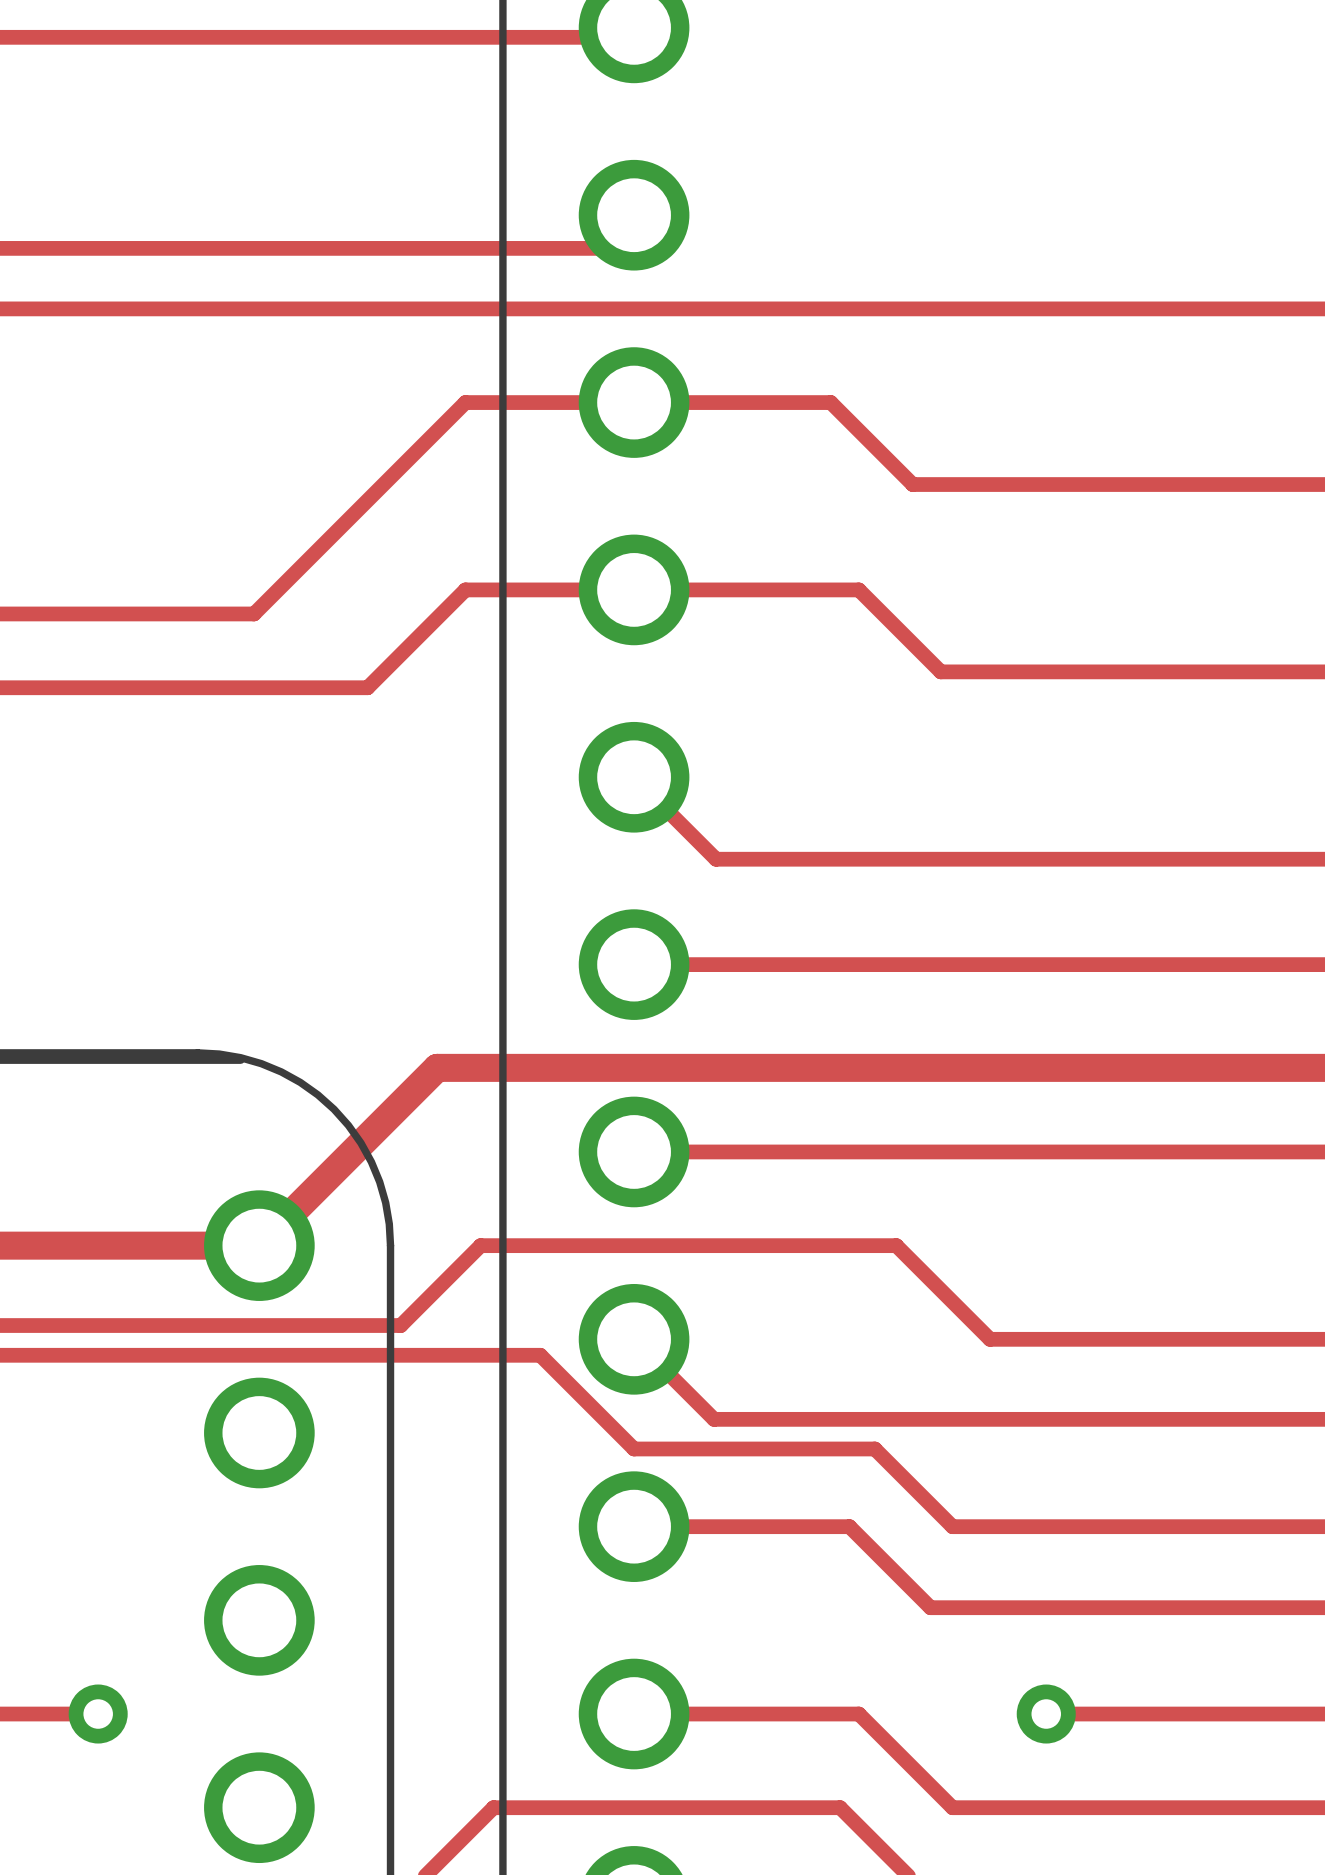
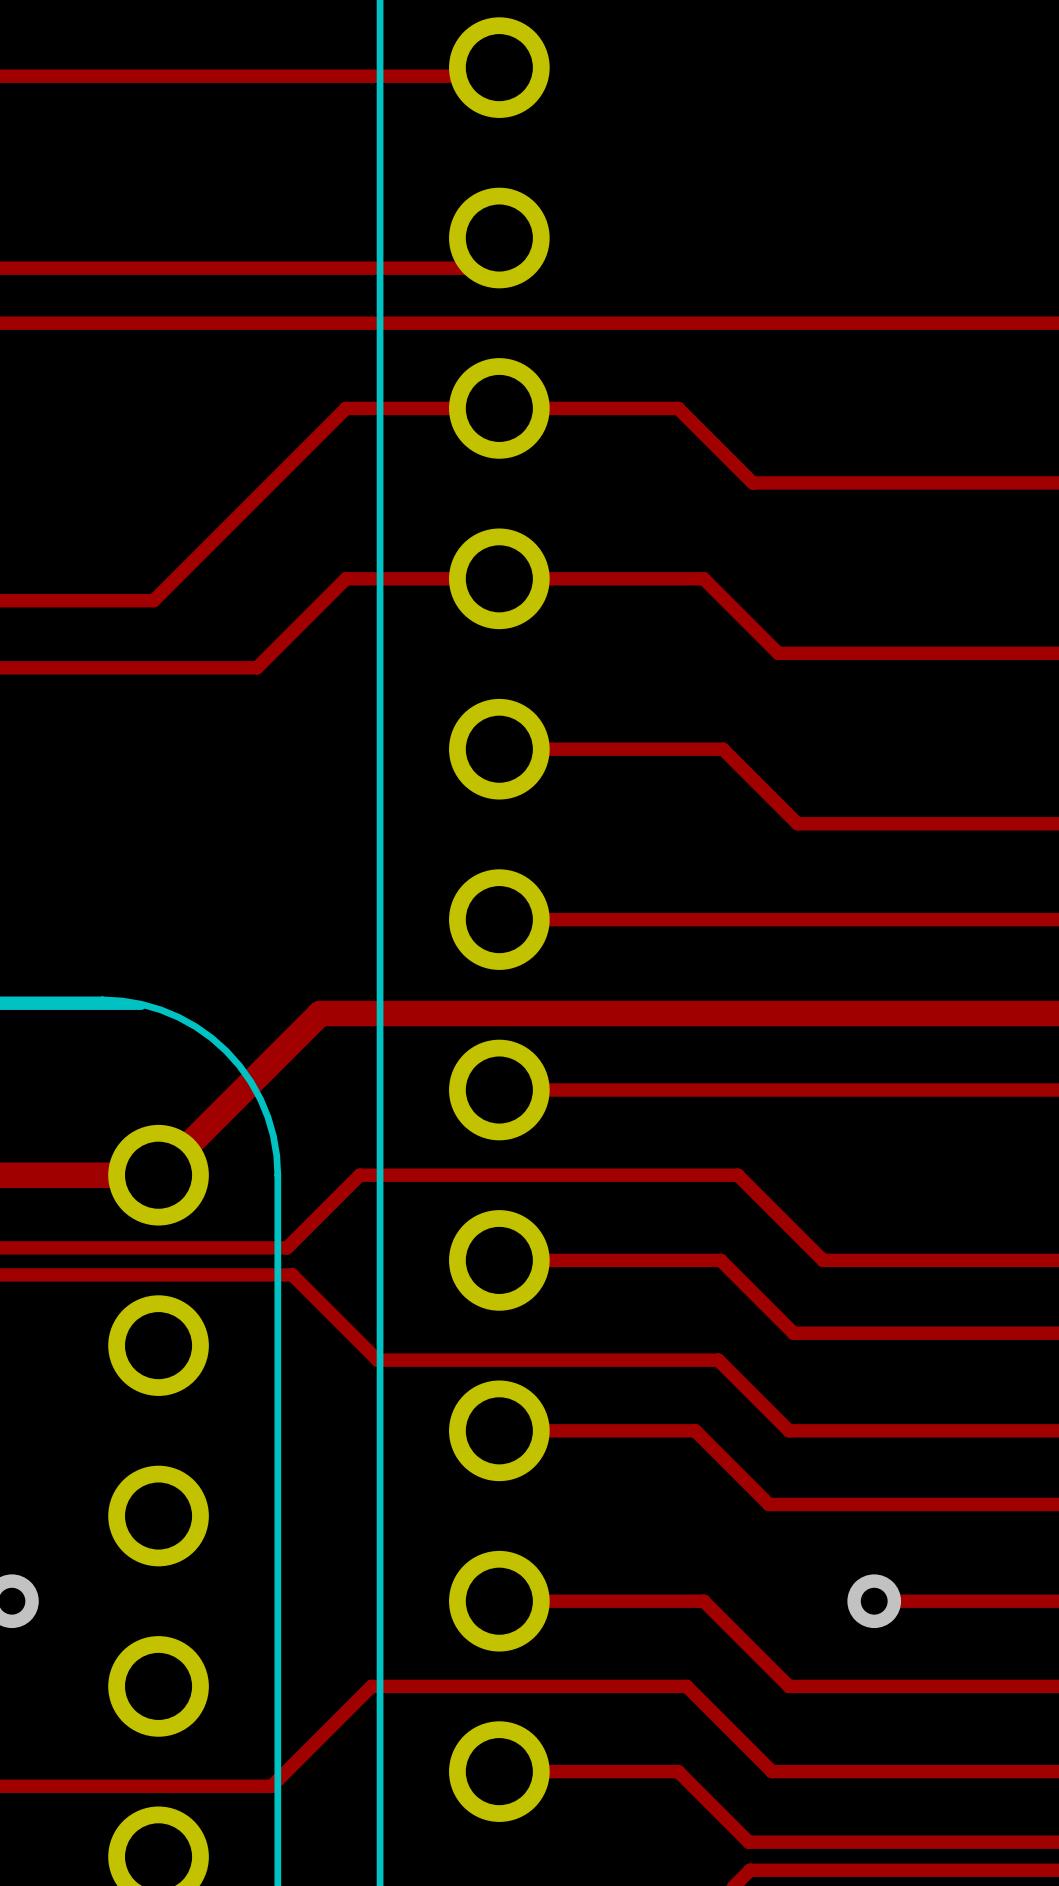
track: (634, 777) (716, 859) (961, 859) -> (499, 749) (723, 749) (797, 823)
track: (634, 1339) (714, 1419) (957, 1419) -> (499, 1260) (720, 1260) (793, 1333)
track: (406, 1355) (540, 1355) (634, 1448) -> (292, 1274) (377, 1360) (499, 1360)

